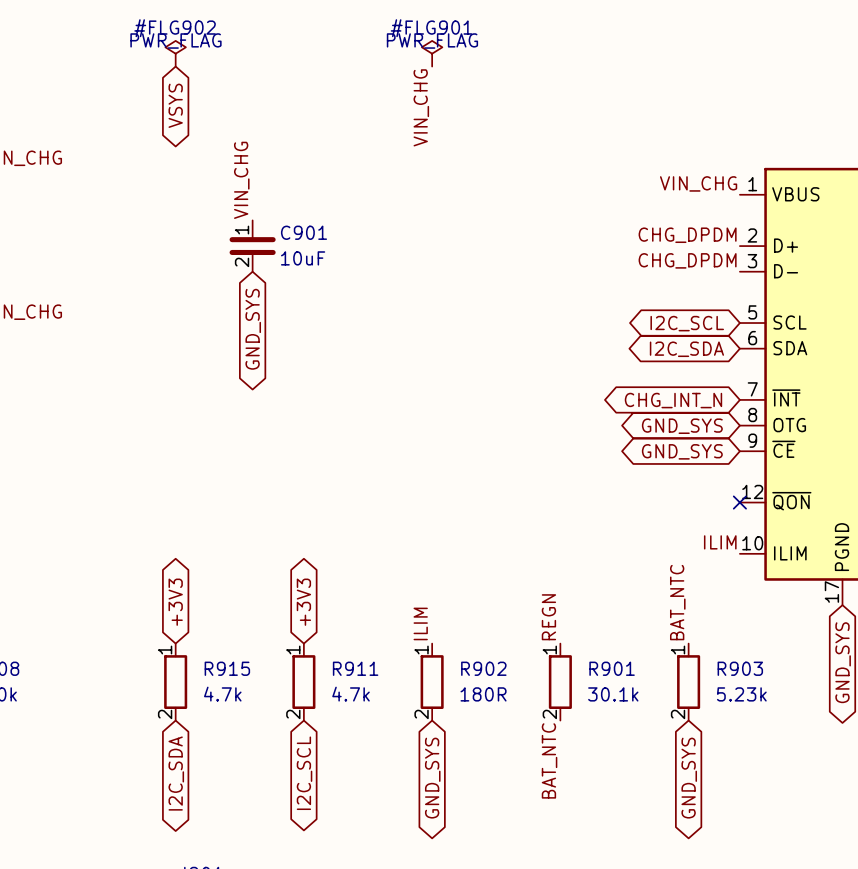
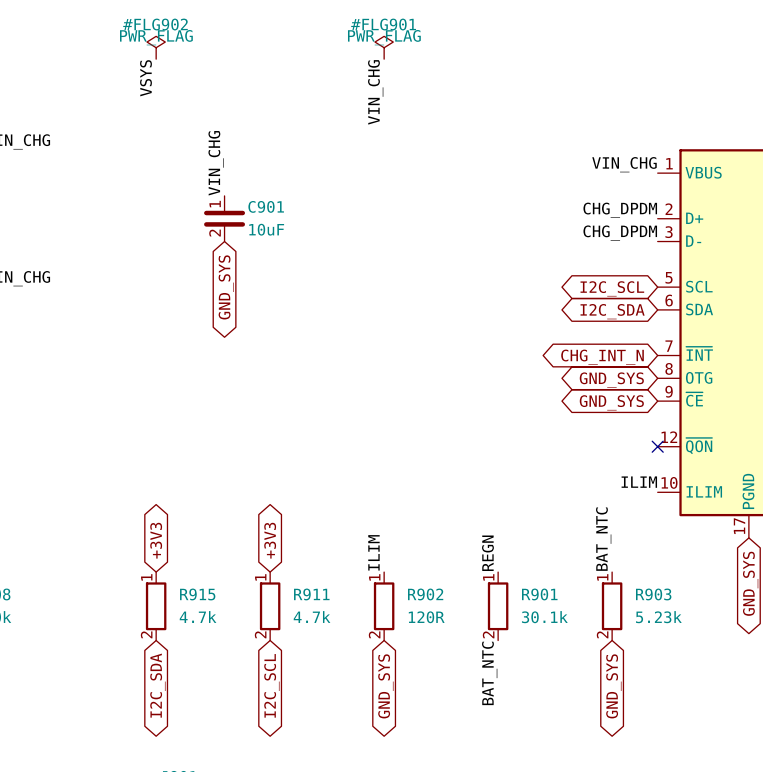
label: none -> VSYS (145, 78)
global label: VSYS (175, 105) -> none
R902 value: 180R (483, 694) -> 120R (426, 617)

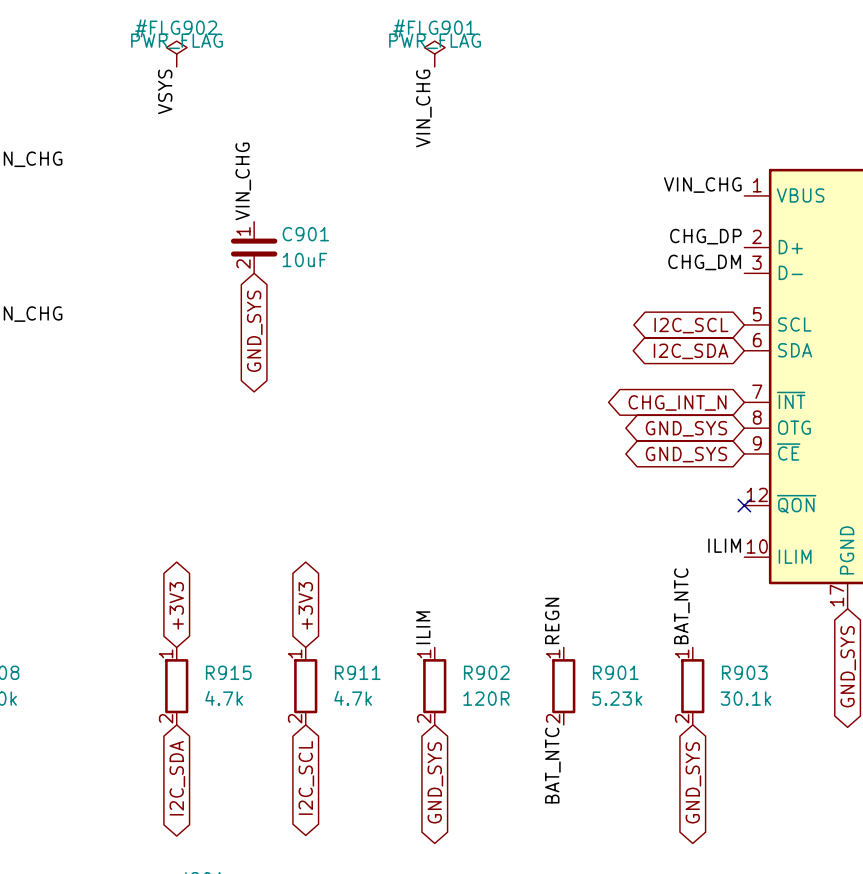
label: CHG_DPDM (620, 210) -> CHG_DP (705, 236)
label: CHG_DPDM (620, 233) -> CHG_DM (704, 262)
R901 value: 30.1k (544, 617) -> 5.23k (617, 698)
R903 value: 5.23k (658, 617) -> 30.1k (746, 698)

